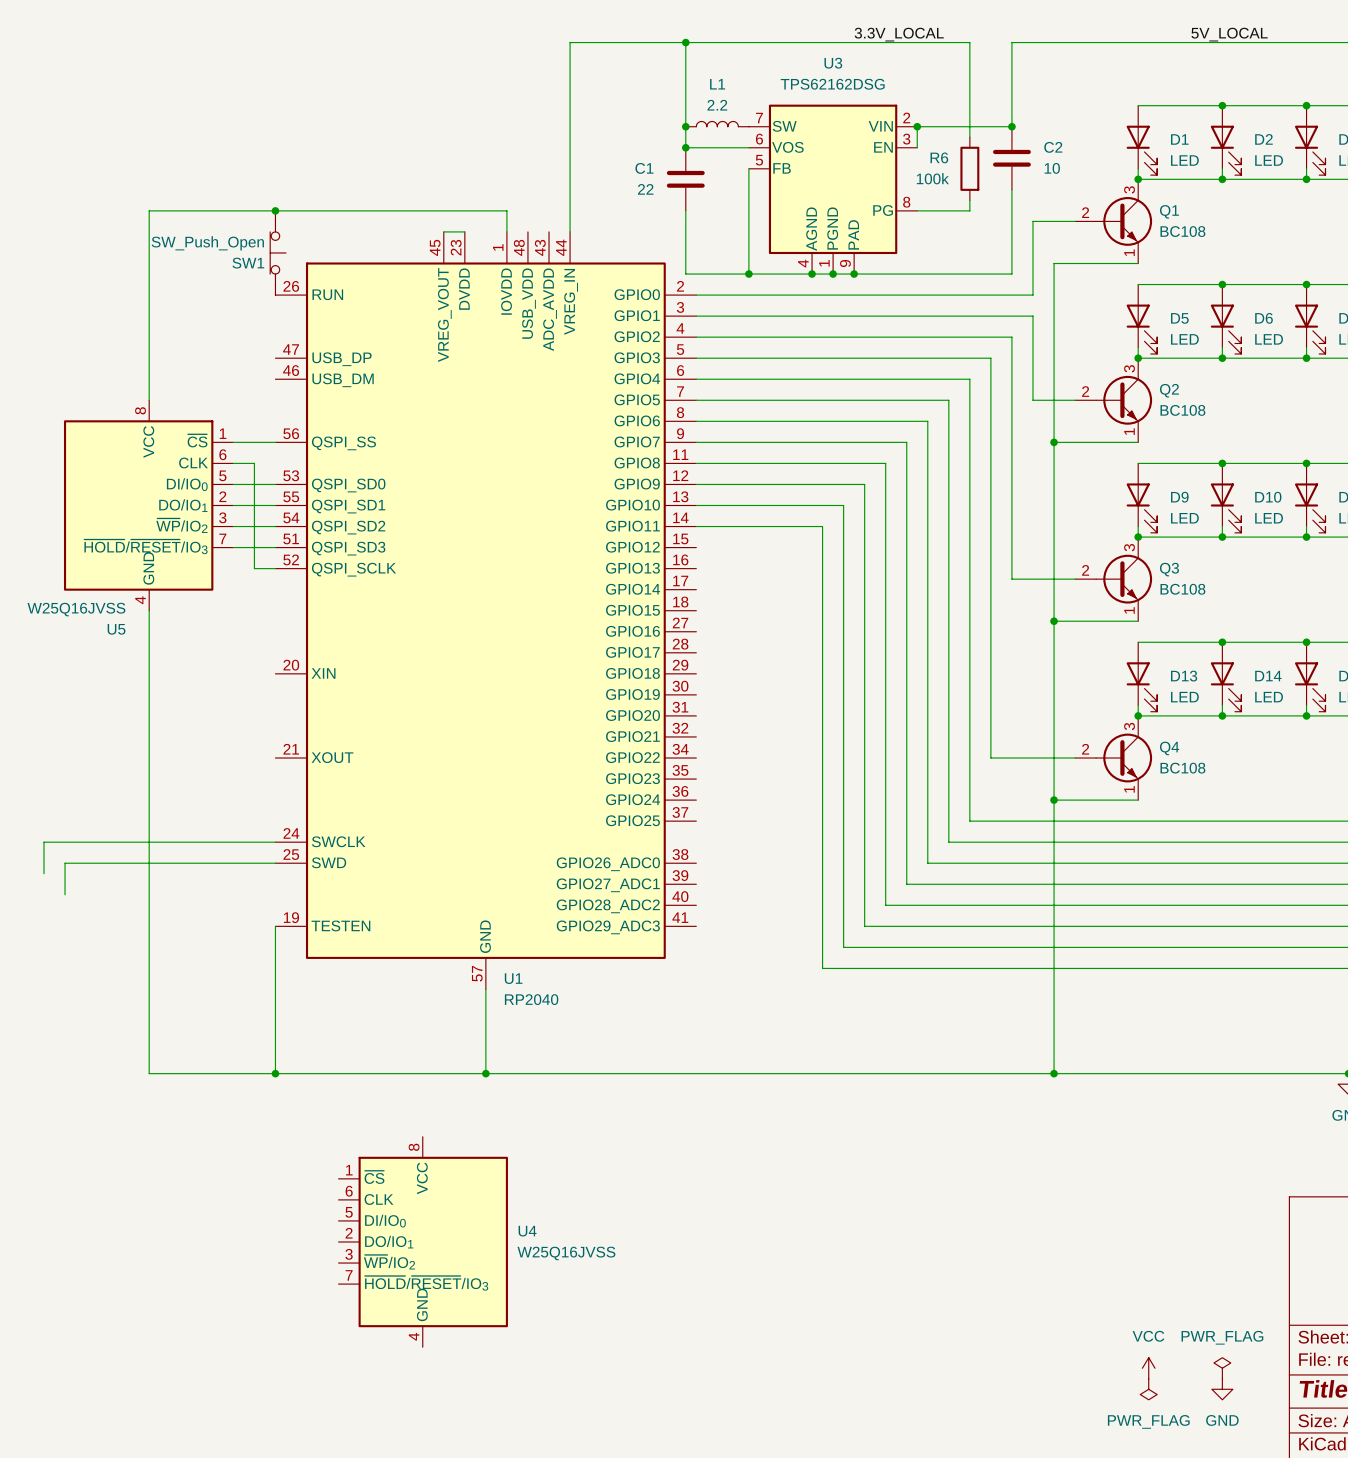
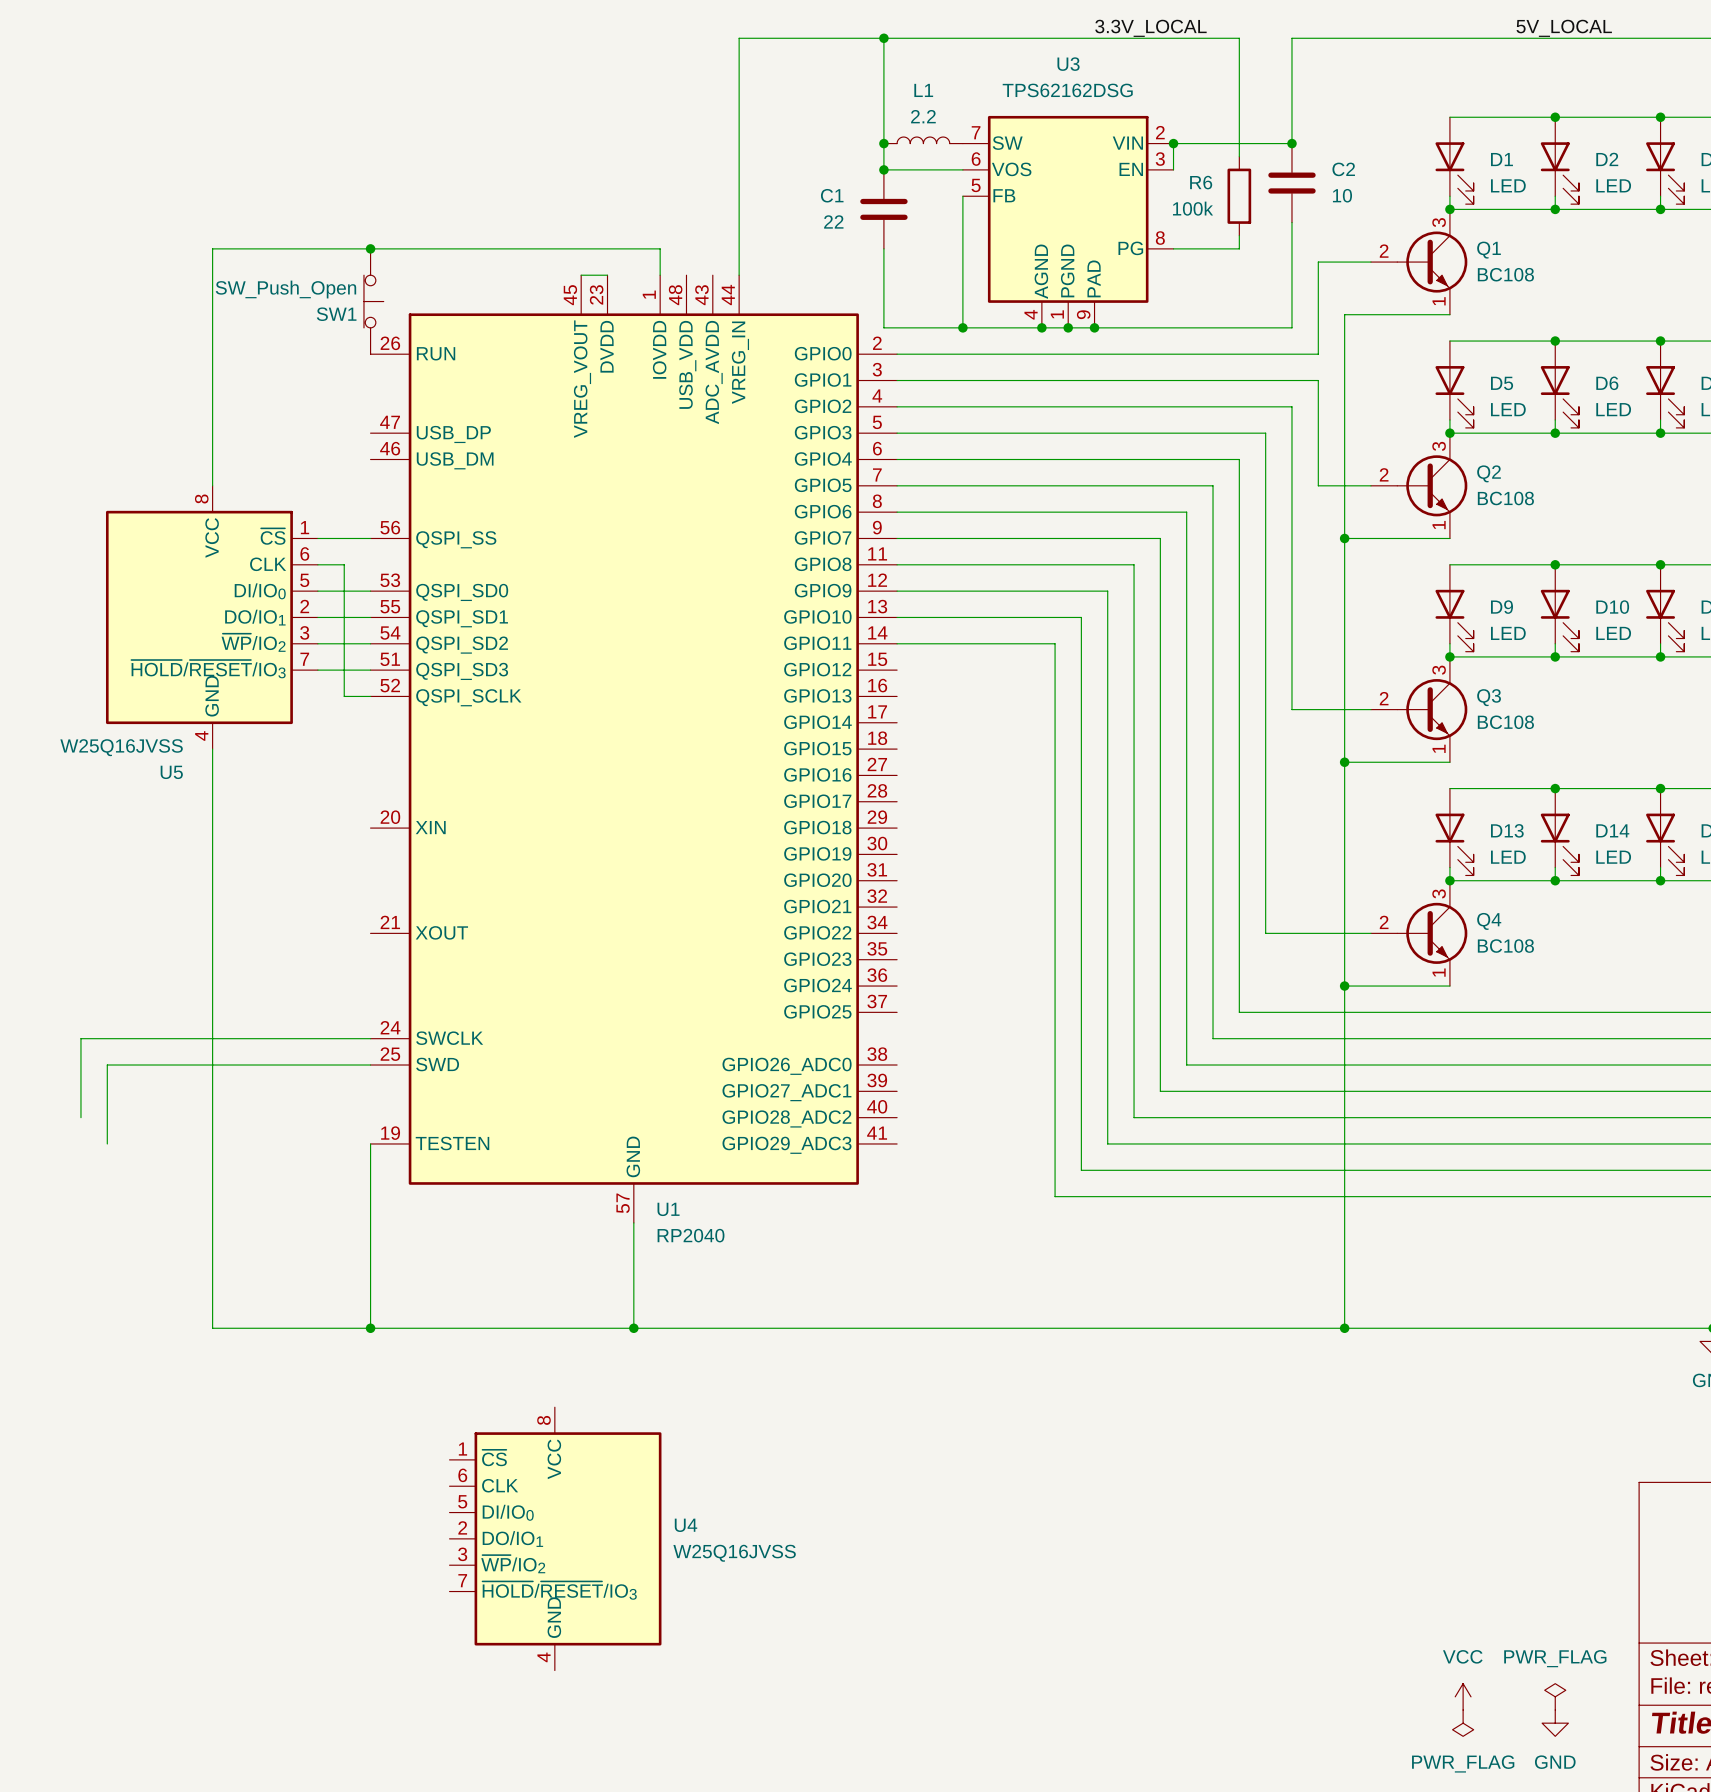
wire: none -> (80, 1078) (80, 1117)
wire: none -> (107, 1104) (107, 1143)

